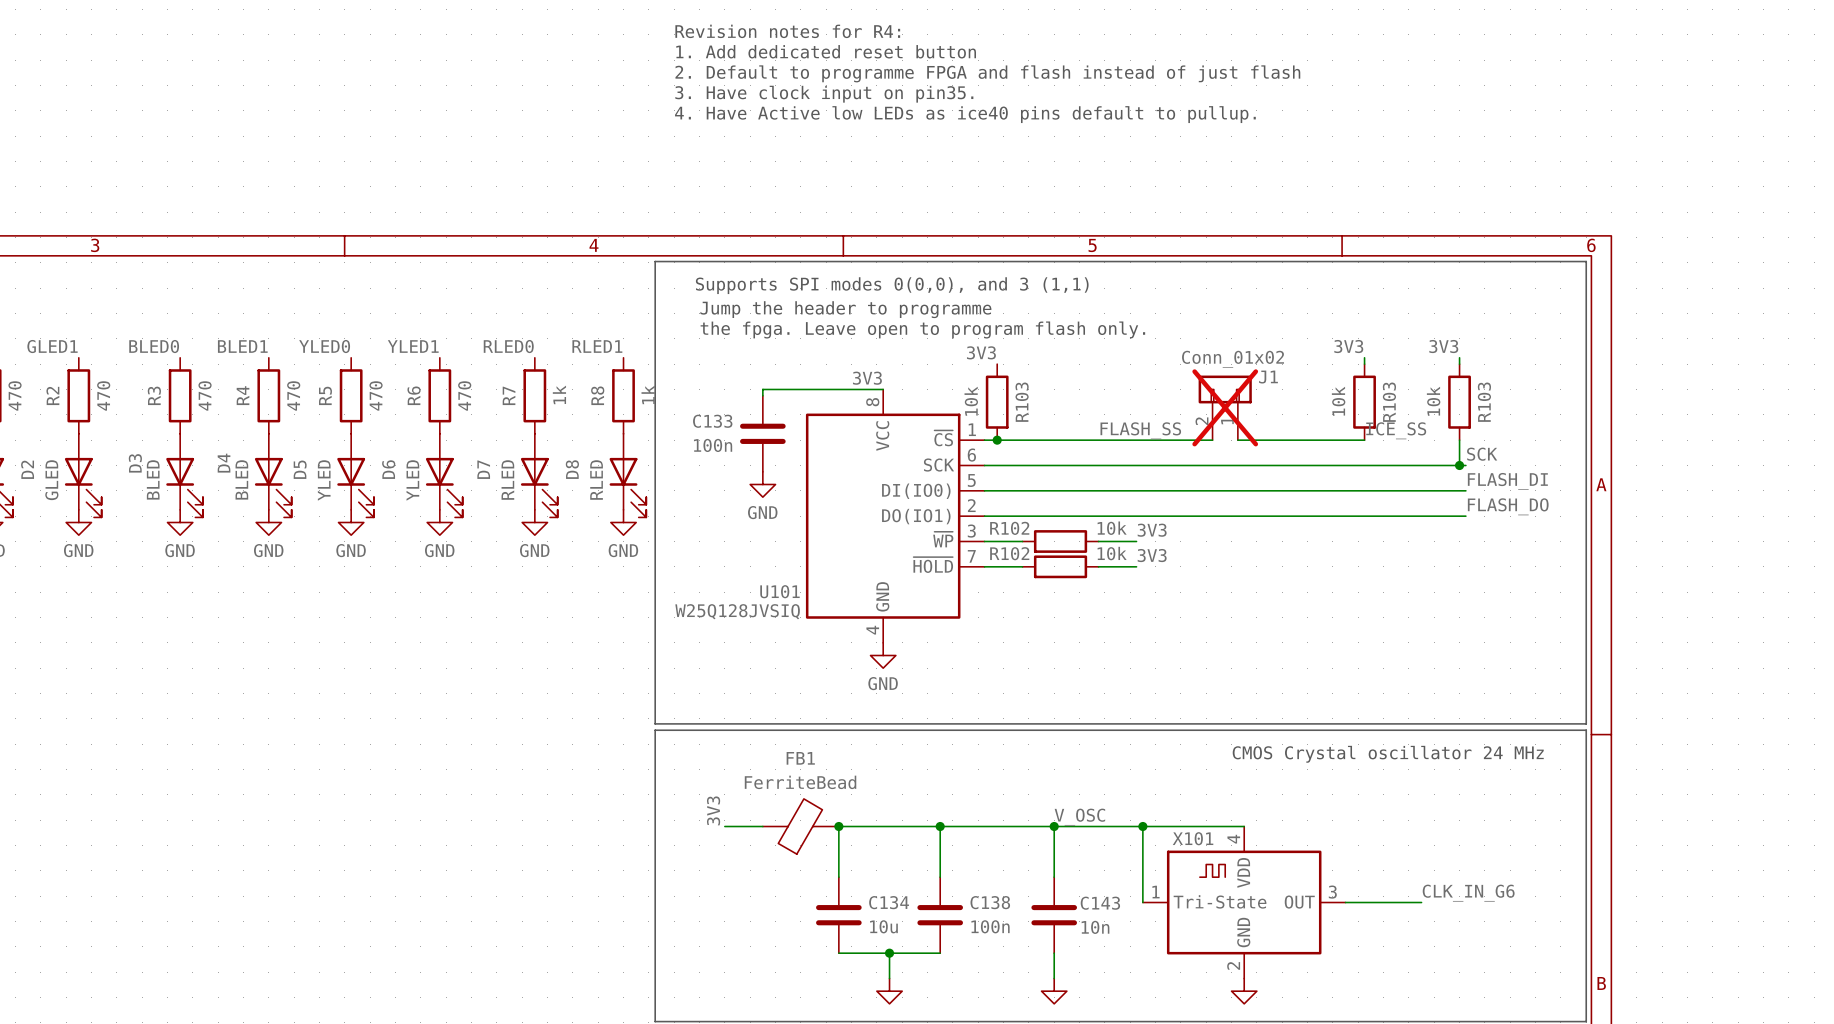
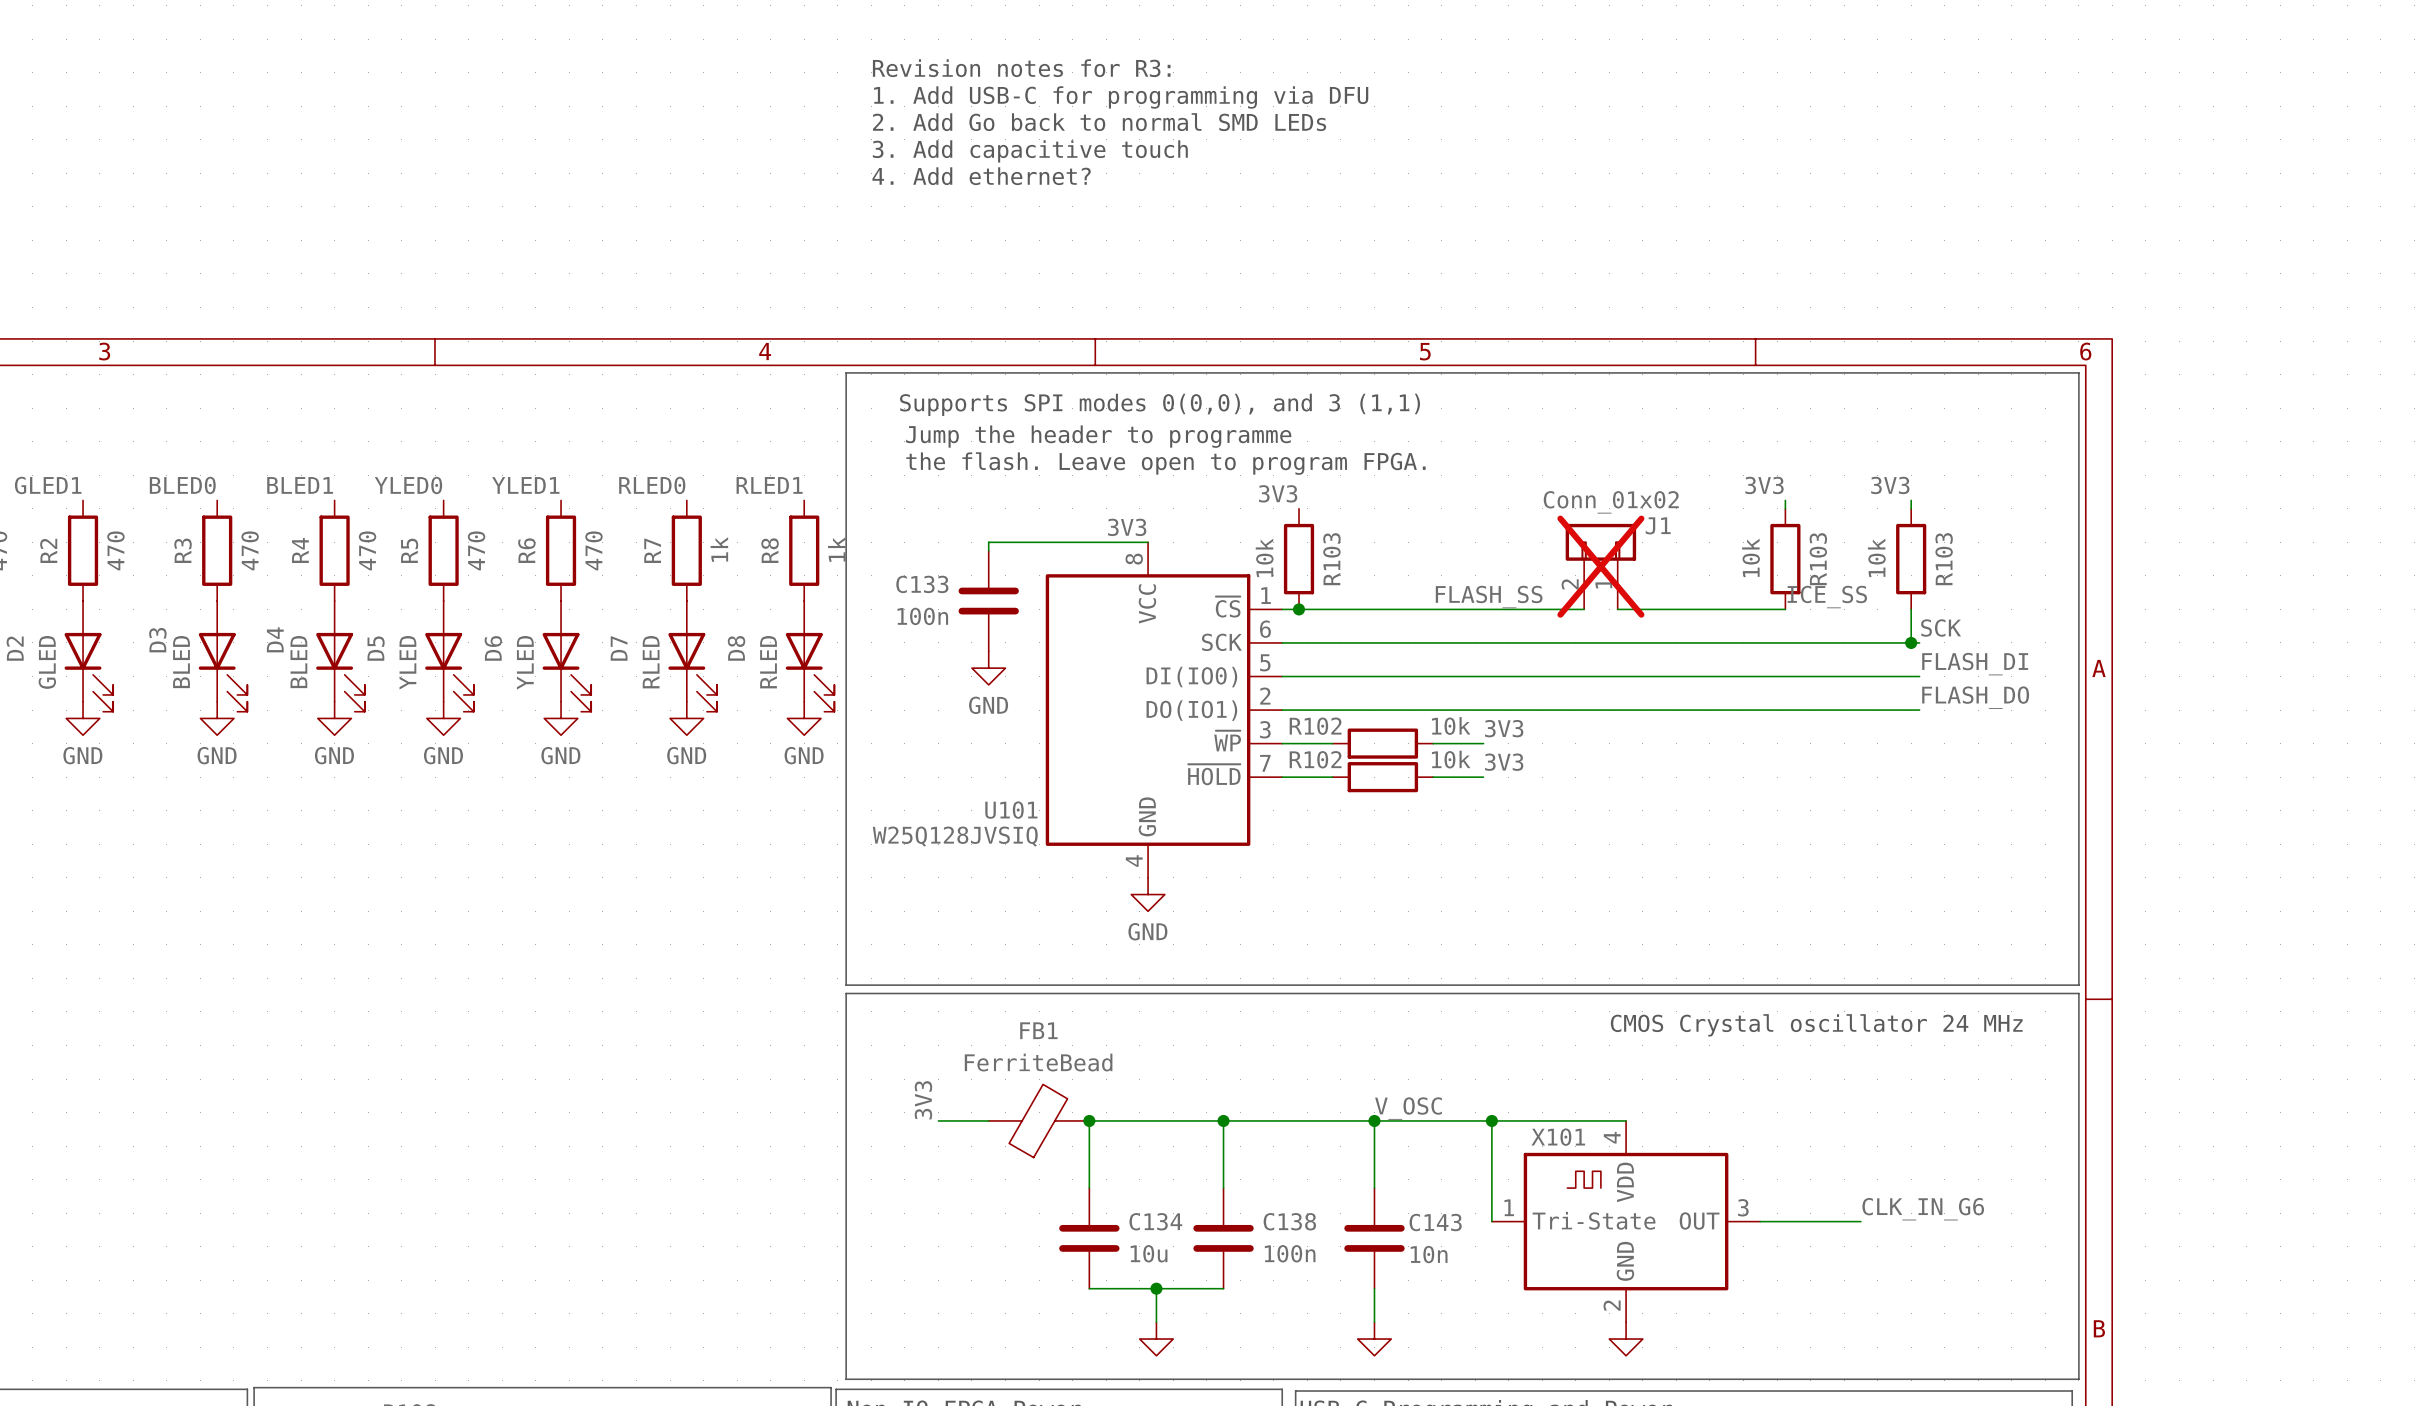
text: Revision notes for R4: (787, 31) -> Revision notes for R3: (1021, 68)
text: 1. Add dedicated reset button (826, 51) -> 1. Add USB-C for programming via DFU (1121, 97)
text: 2. Default to programme FPGA and flash instead of just flash (987, 73) -> 2. Add Go back to normal SMD LEDs (1099, 122)
text: 3. Have clock input on pin35. (824, 94) -> 3. Add capacitive touch (1030, 151)
text: 4. Have Active low LEDs as ice40 pins default to pullup. (965, 114) -> 4. Add ethernet? (981, 176)
text: the fpga. Leave open to program flash only. (922, 329) -> the flash. Leave open to program FPGA. (1165, 463)

